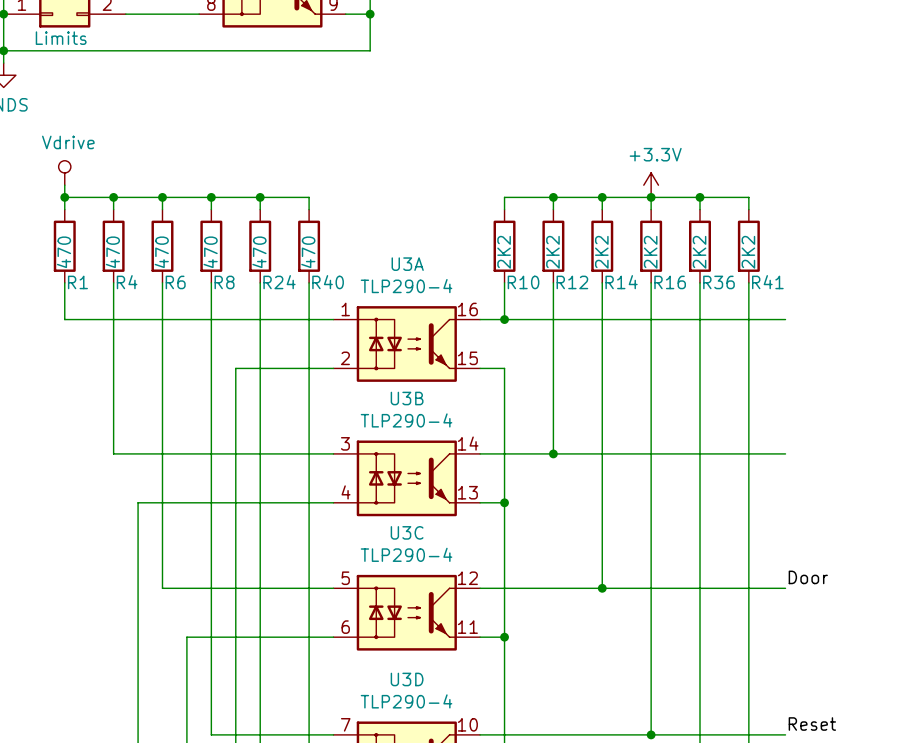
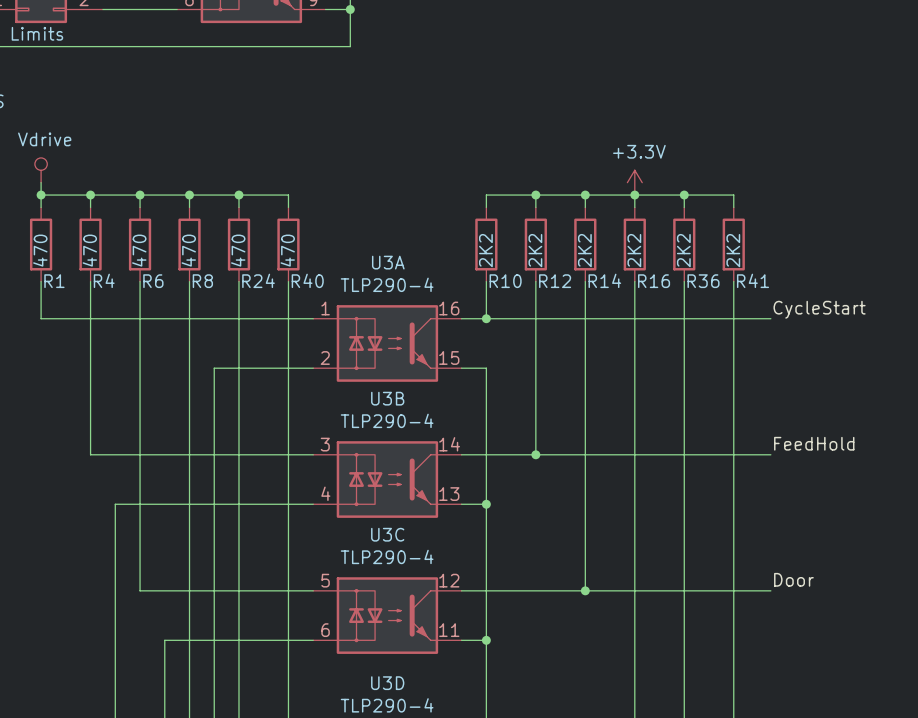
label: none -> CycleStart (819, 309)
label: none -> FeedHold (814, 443)

